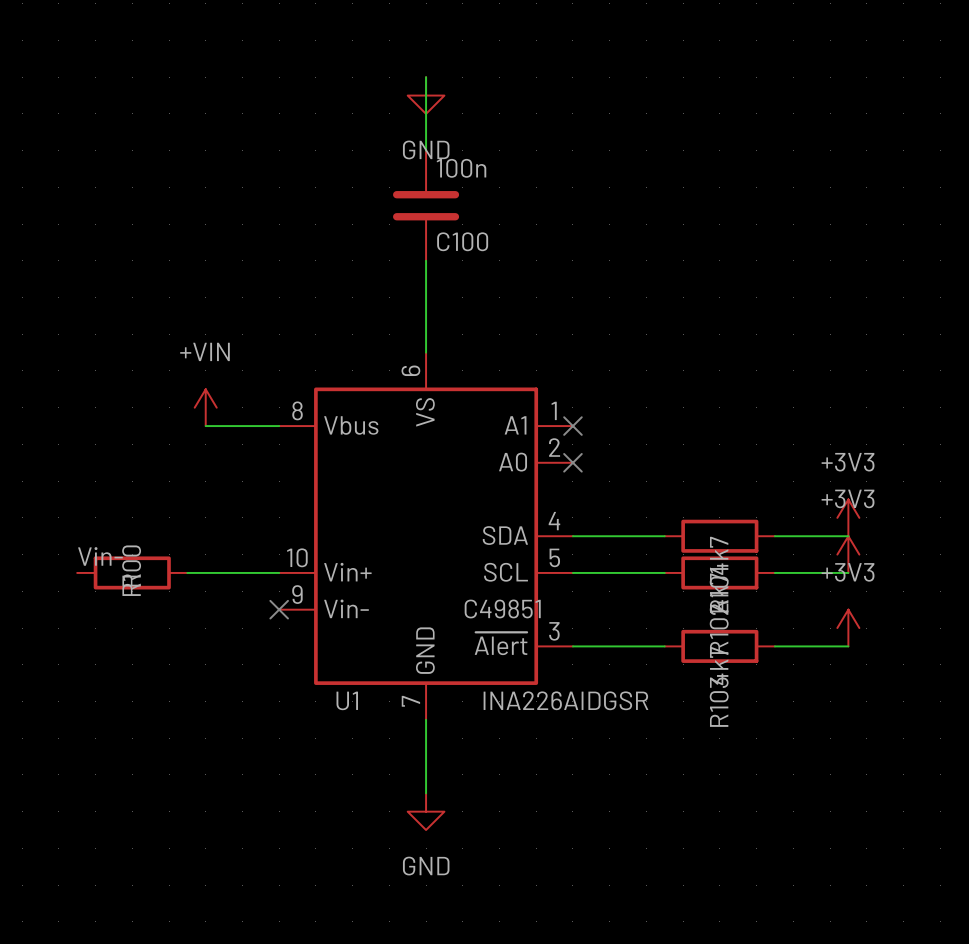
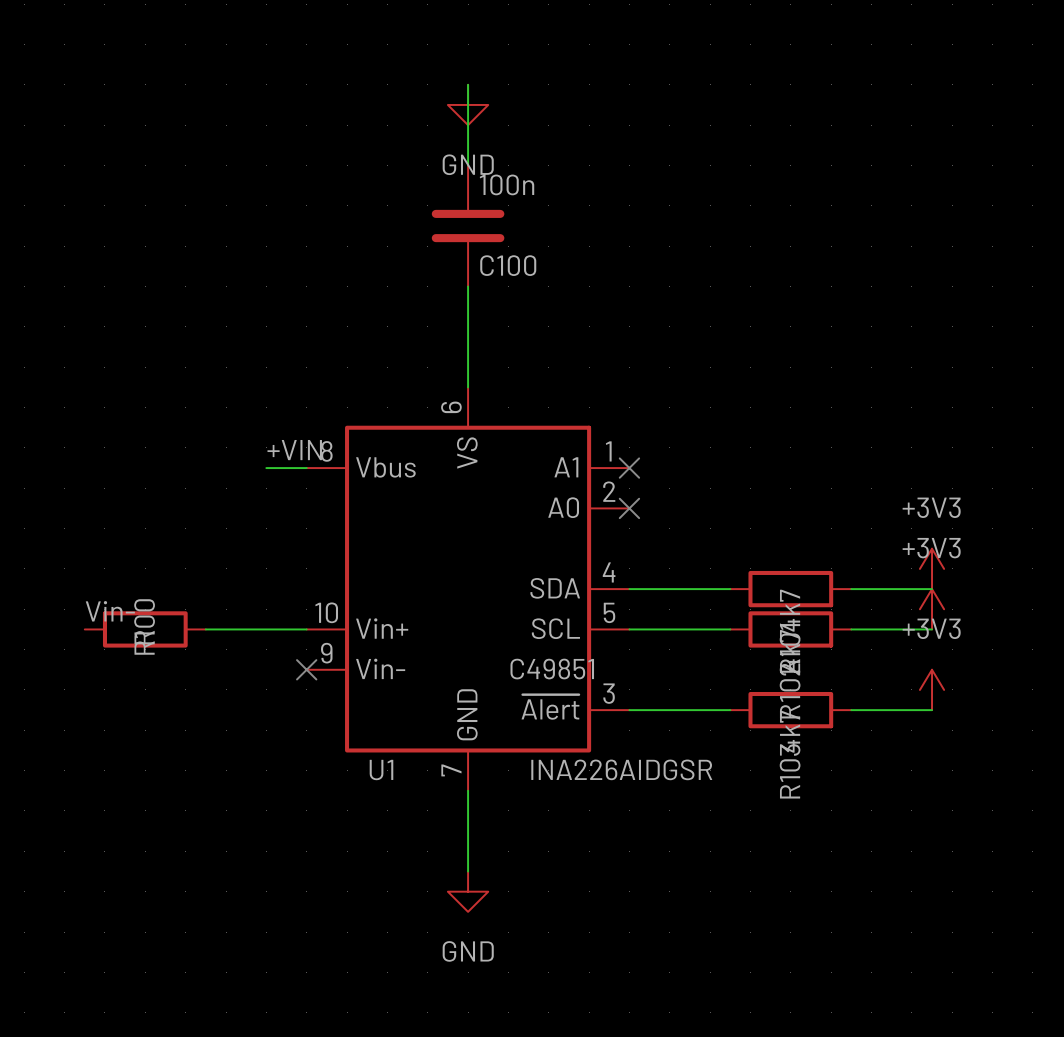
power symbol: +VIN (205, 407) -> none
label: none -> +VIN (294, 450)
wire: (205, 426) (242, 426) -> none

